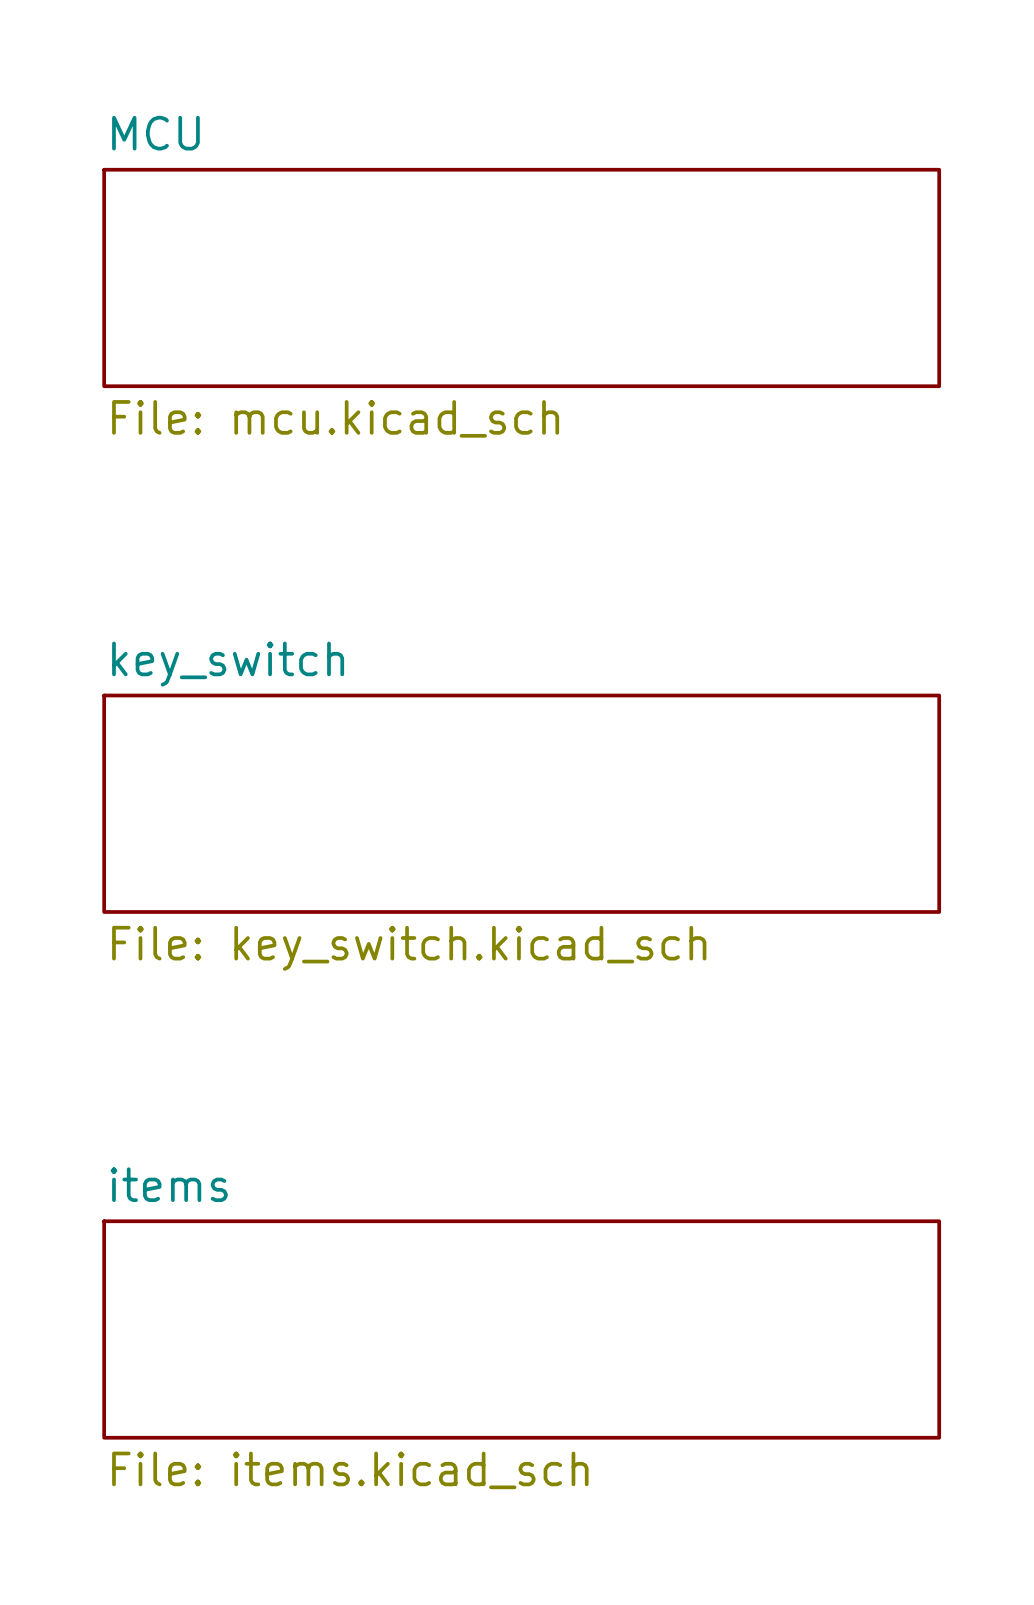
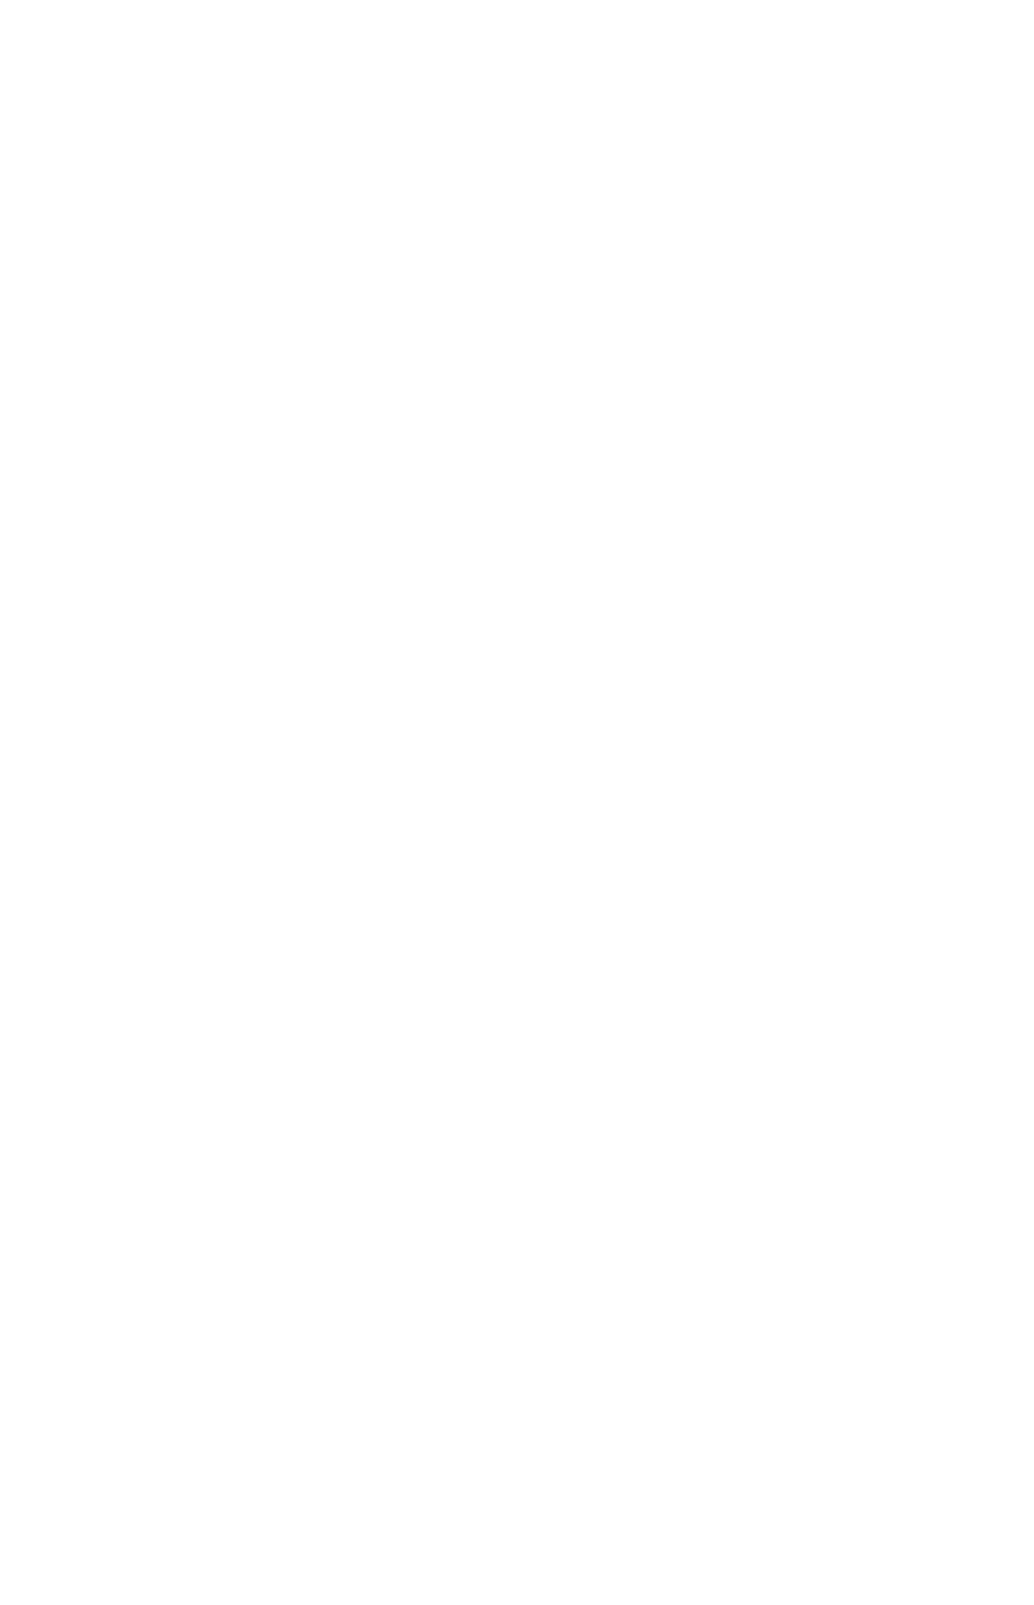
sheet MCU: File: mcu.kicad_sch (521, 277) -> none
sheet key_switch: File: key_switch.kicad_sch (521, 803) -> none
sheet items: File: items.kicad_sch (521, 1329) -> none

